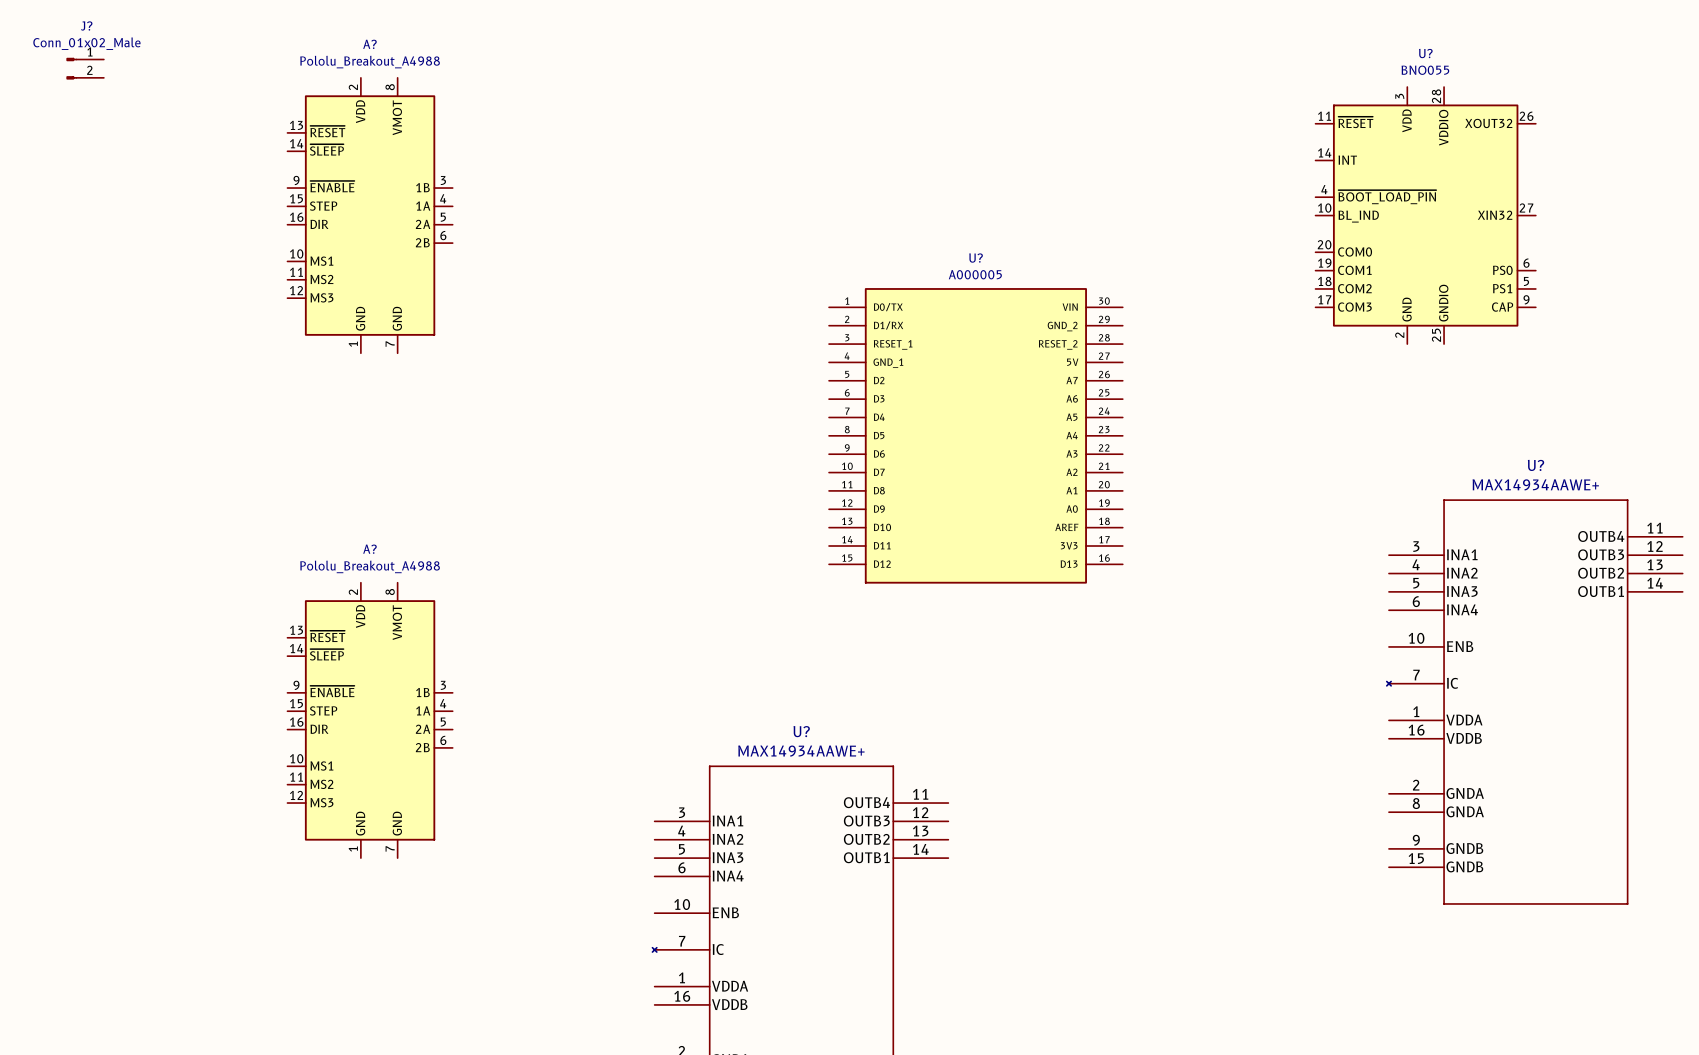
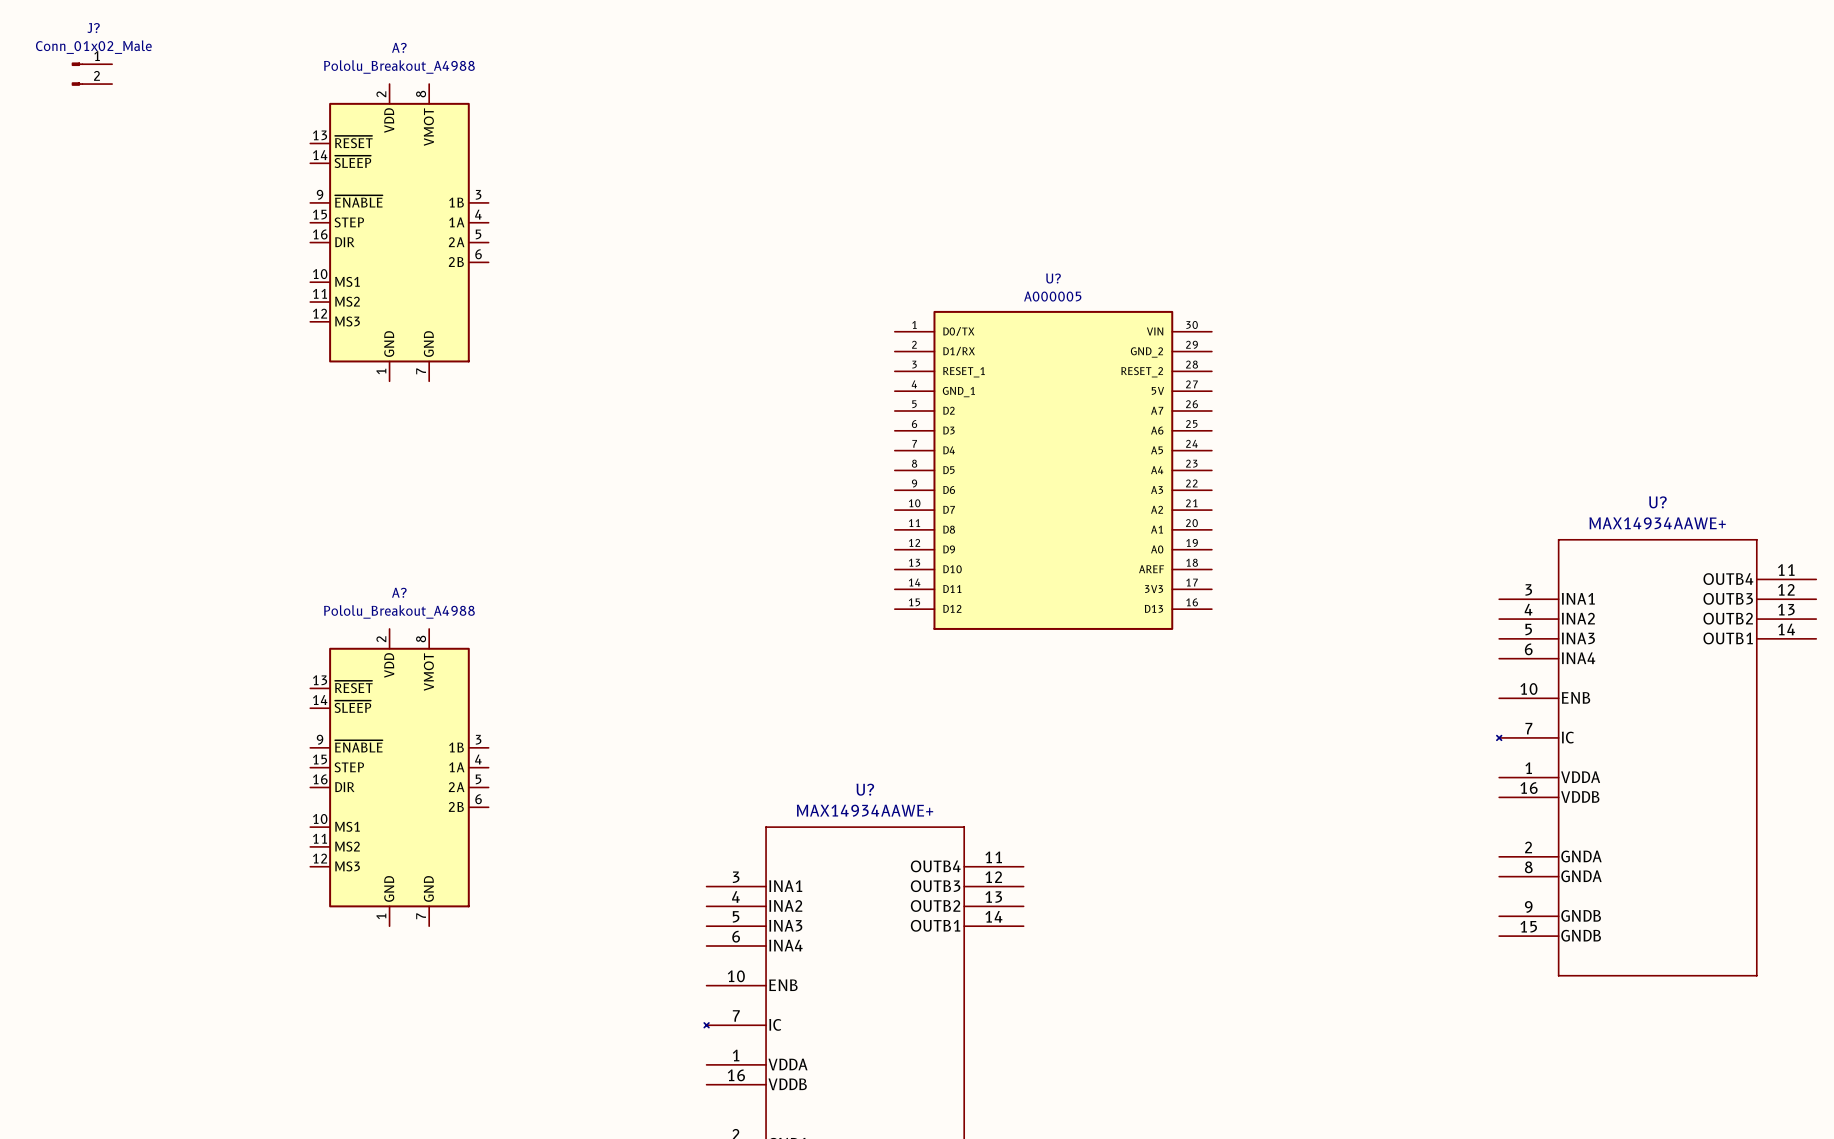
U?: BNO055 (1425, 215) -> none

